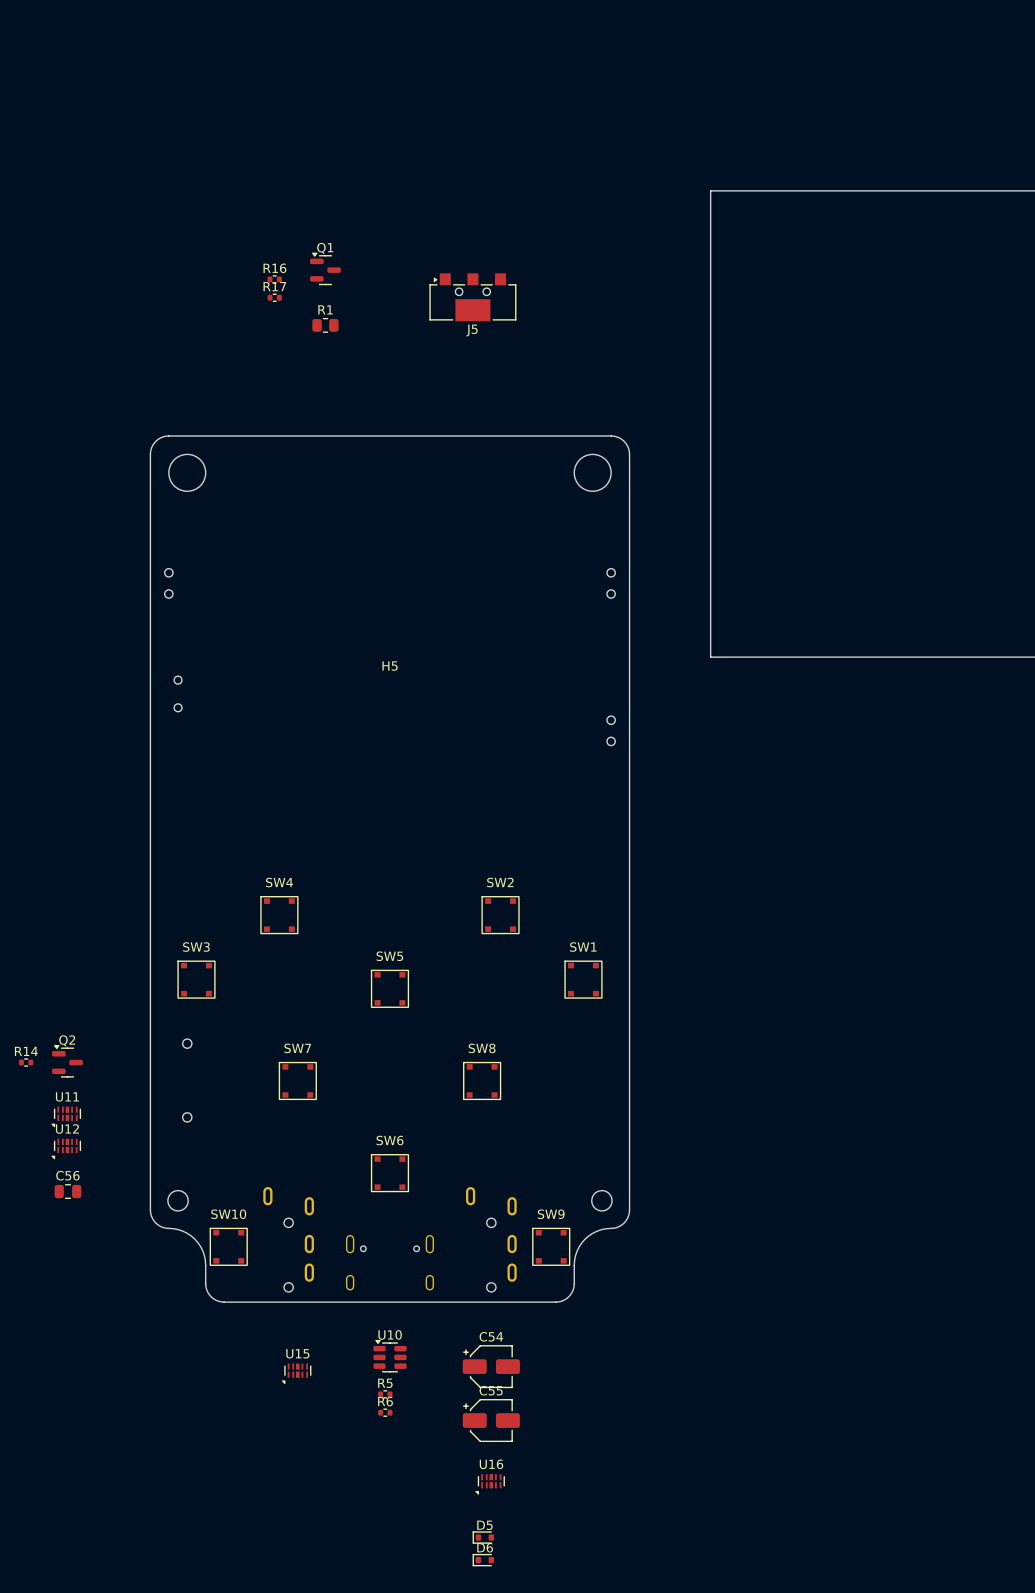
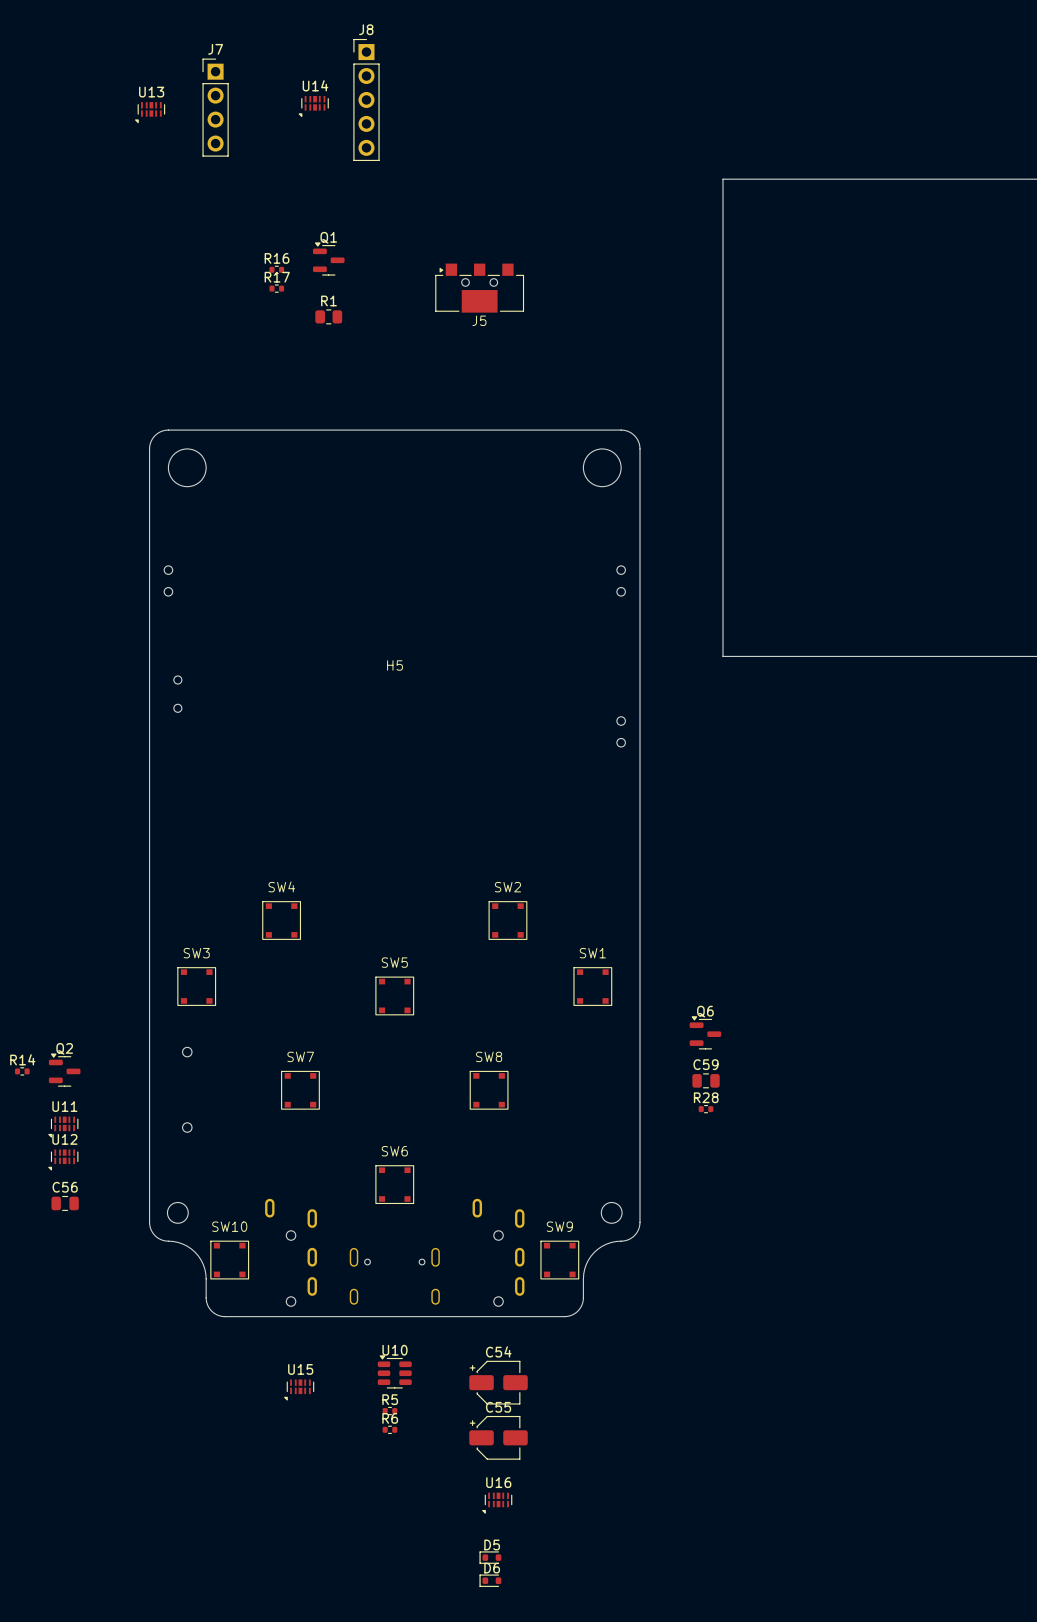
J8: none -> (366, 99)
U14: none -> (313, 106)
J7: none -> (215, 107)
U13: none -> (150, 112)
Q6: none -> (705, 1032)
C59: none -> (706, 1080)
R28: none -> (706, 1109)

